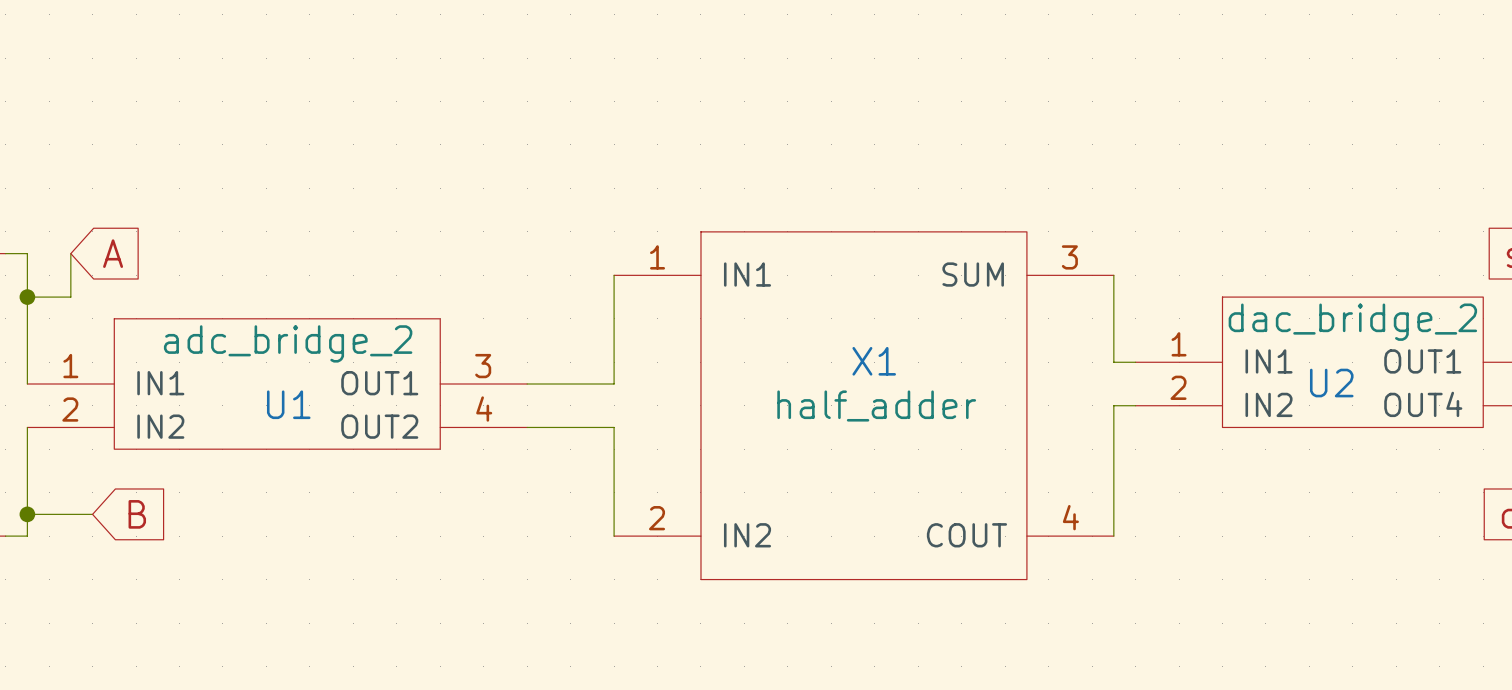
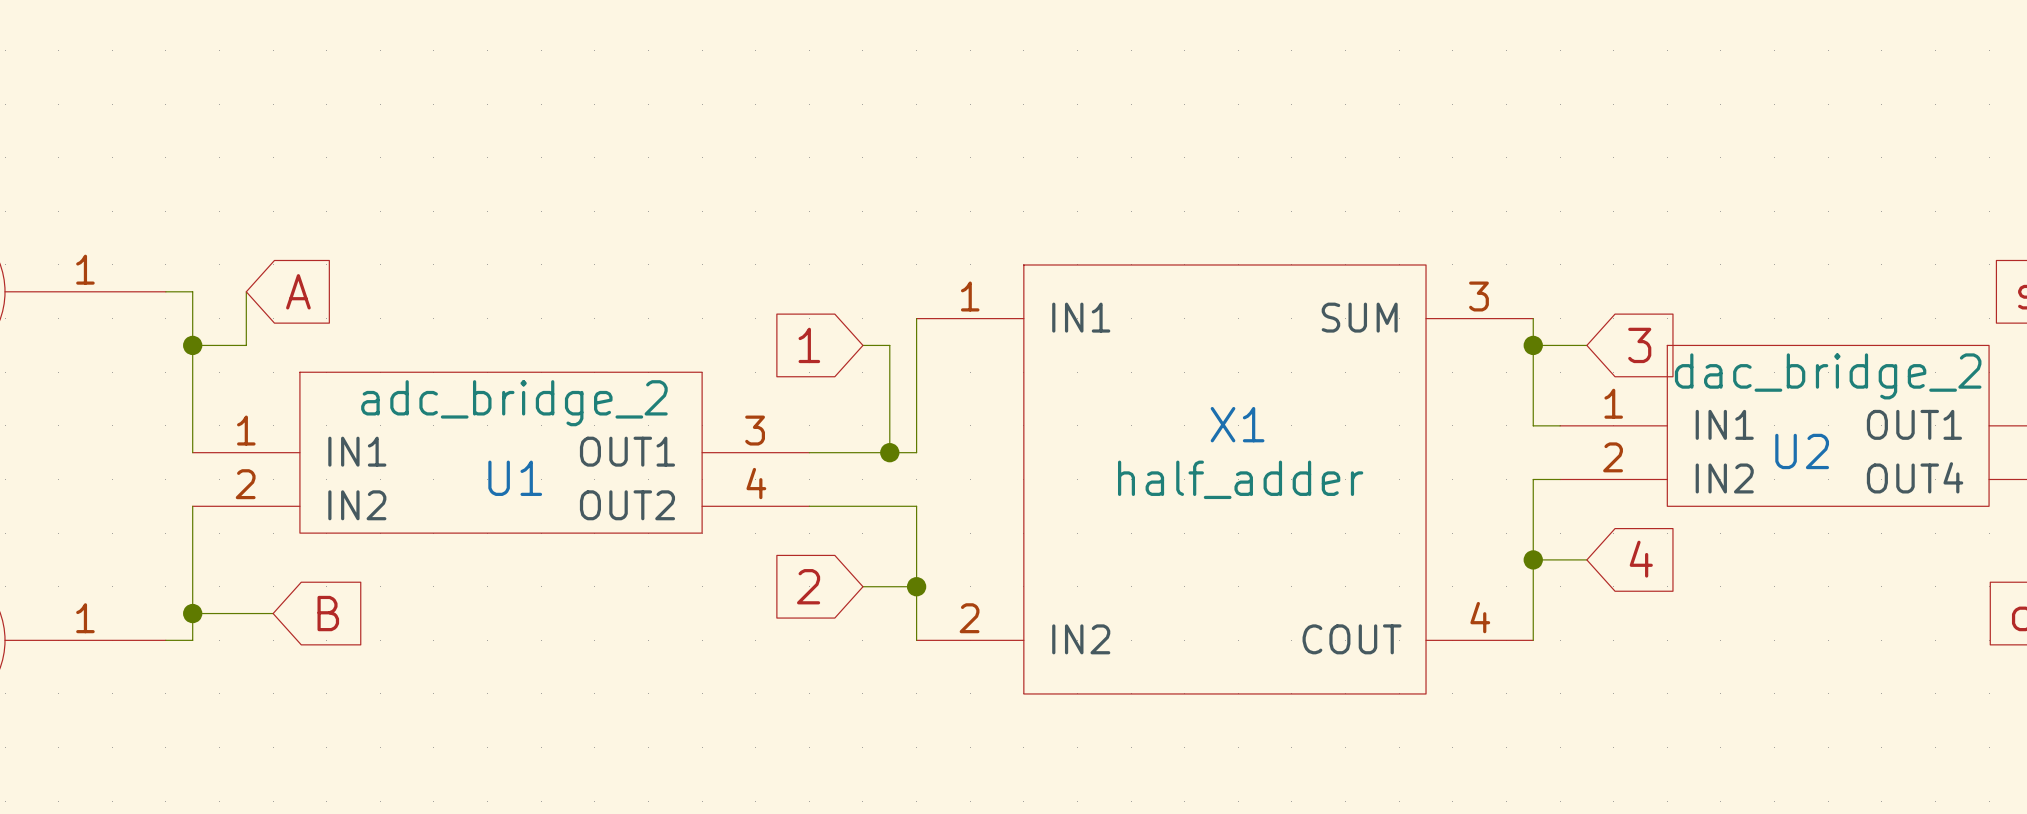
global label: none -> 1 (809, 345)
wire: none -> (862, 345) (889, 345) (889, 452)
wire: none -> (1533, 345) (1586, 345)
junction: none -> (1533, 345)
global label: none -> 3 (1639, 345)
junction: none -> (889, 452)
wire: none -> (1533, 559) (1586, 559)
junction: none -> (1533, 559)
global label: none -> 4 (1641, 559)
global label: none -> 2 (808, 586)
wire: none -> (862, 586) (916, 586)
junction: none -> (916, 586)

